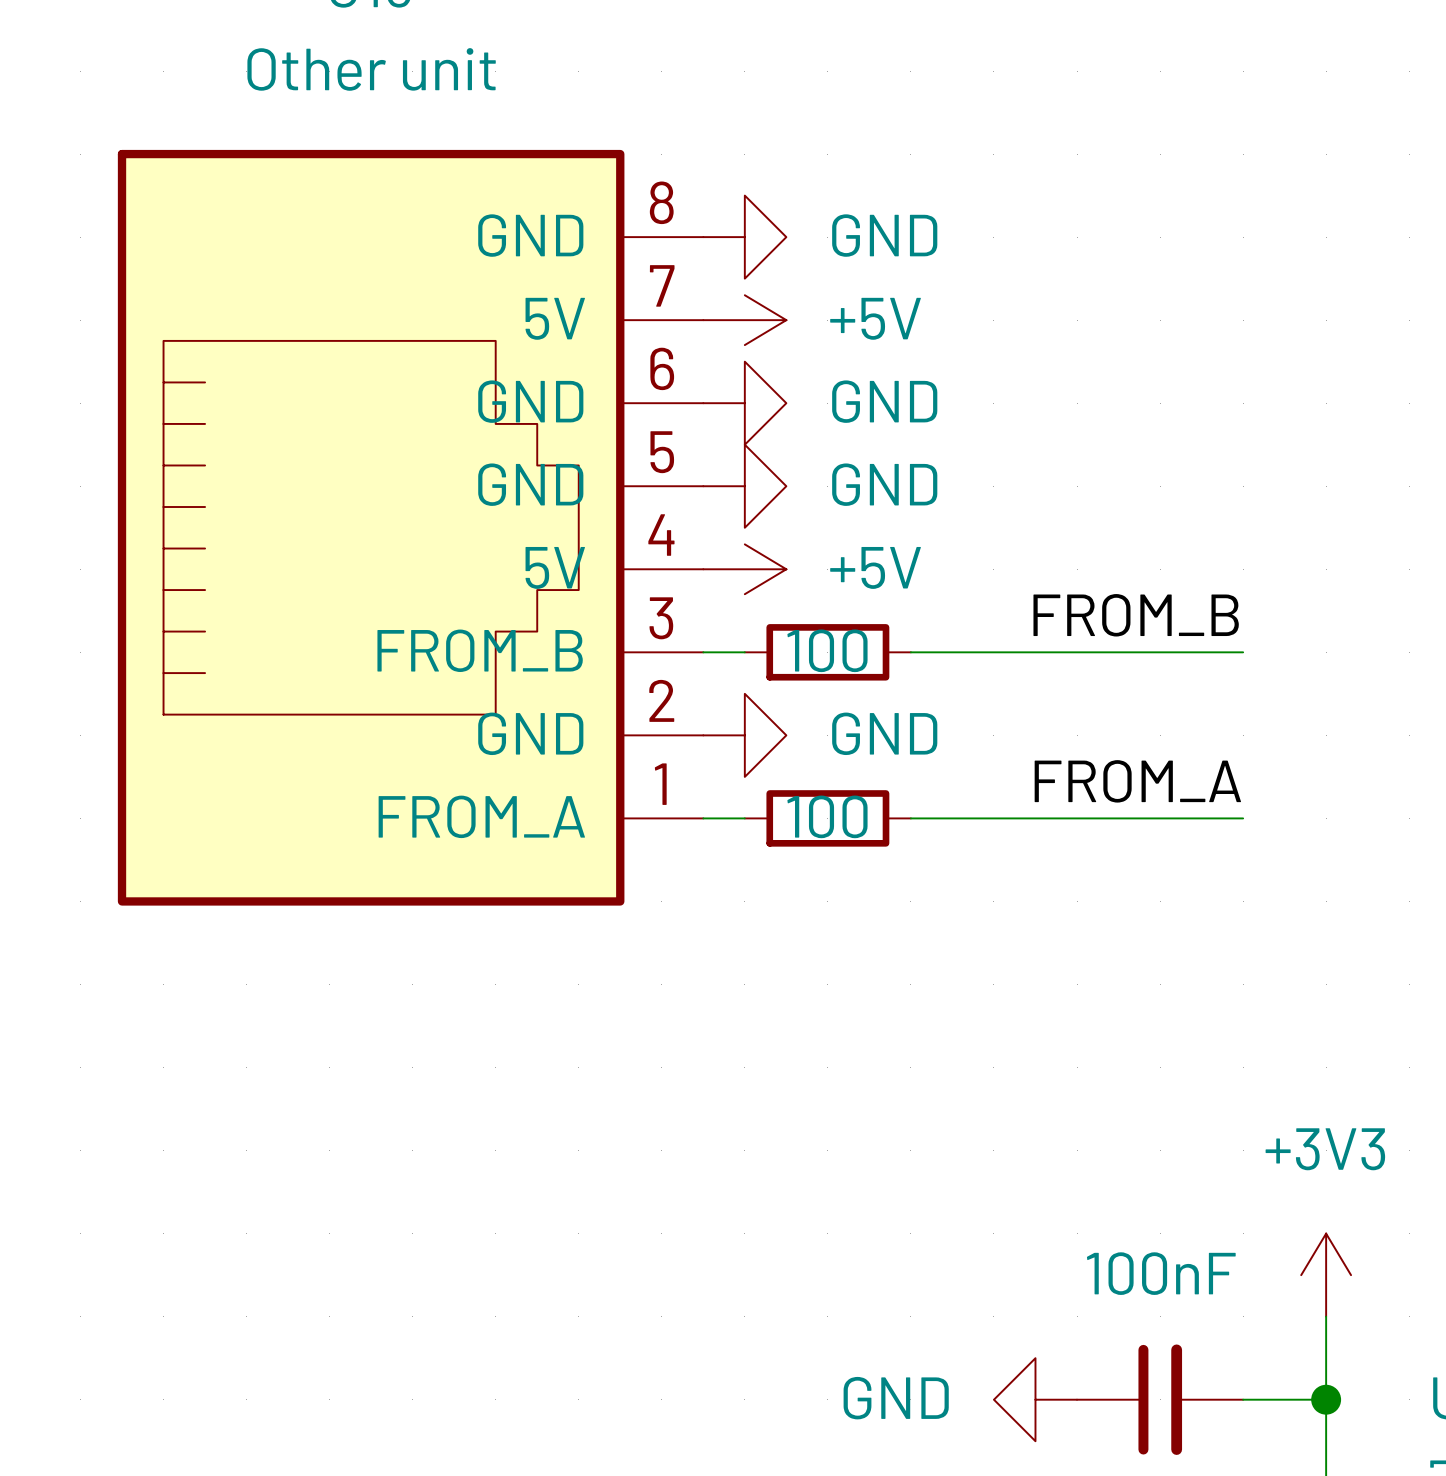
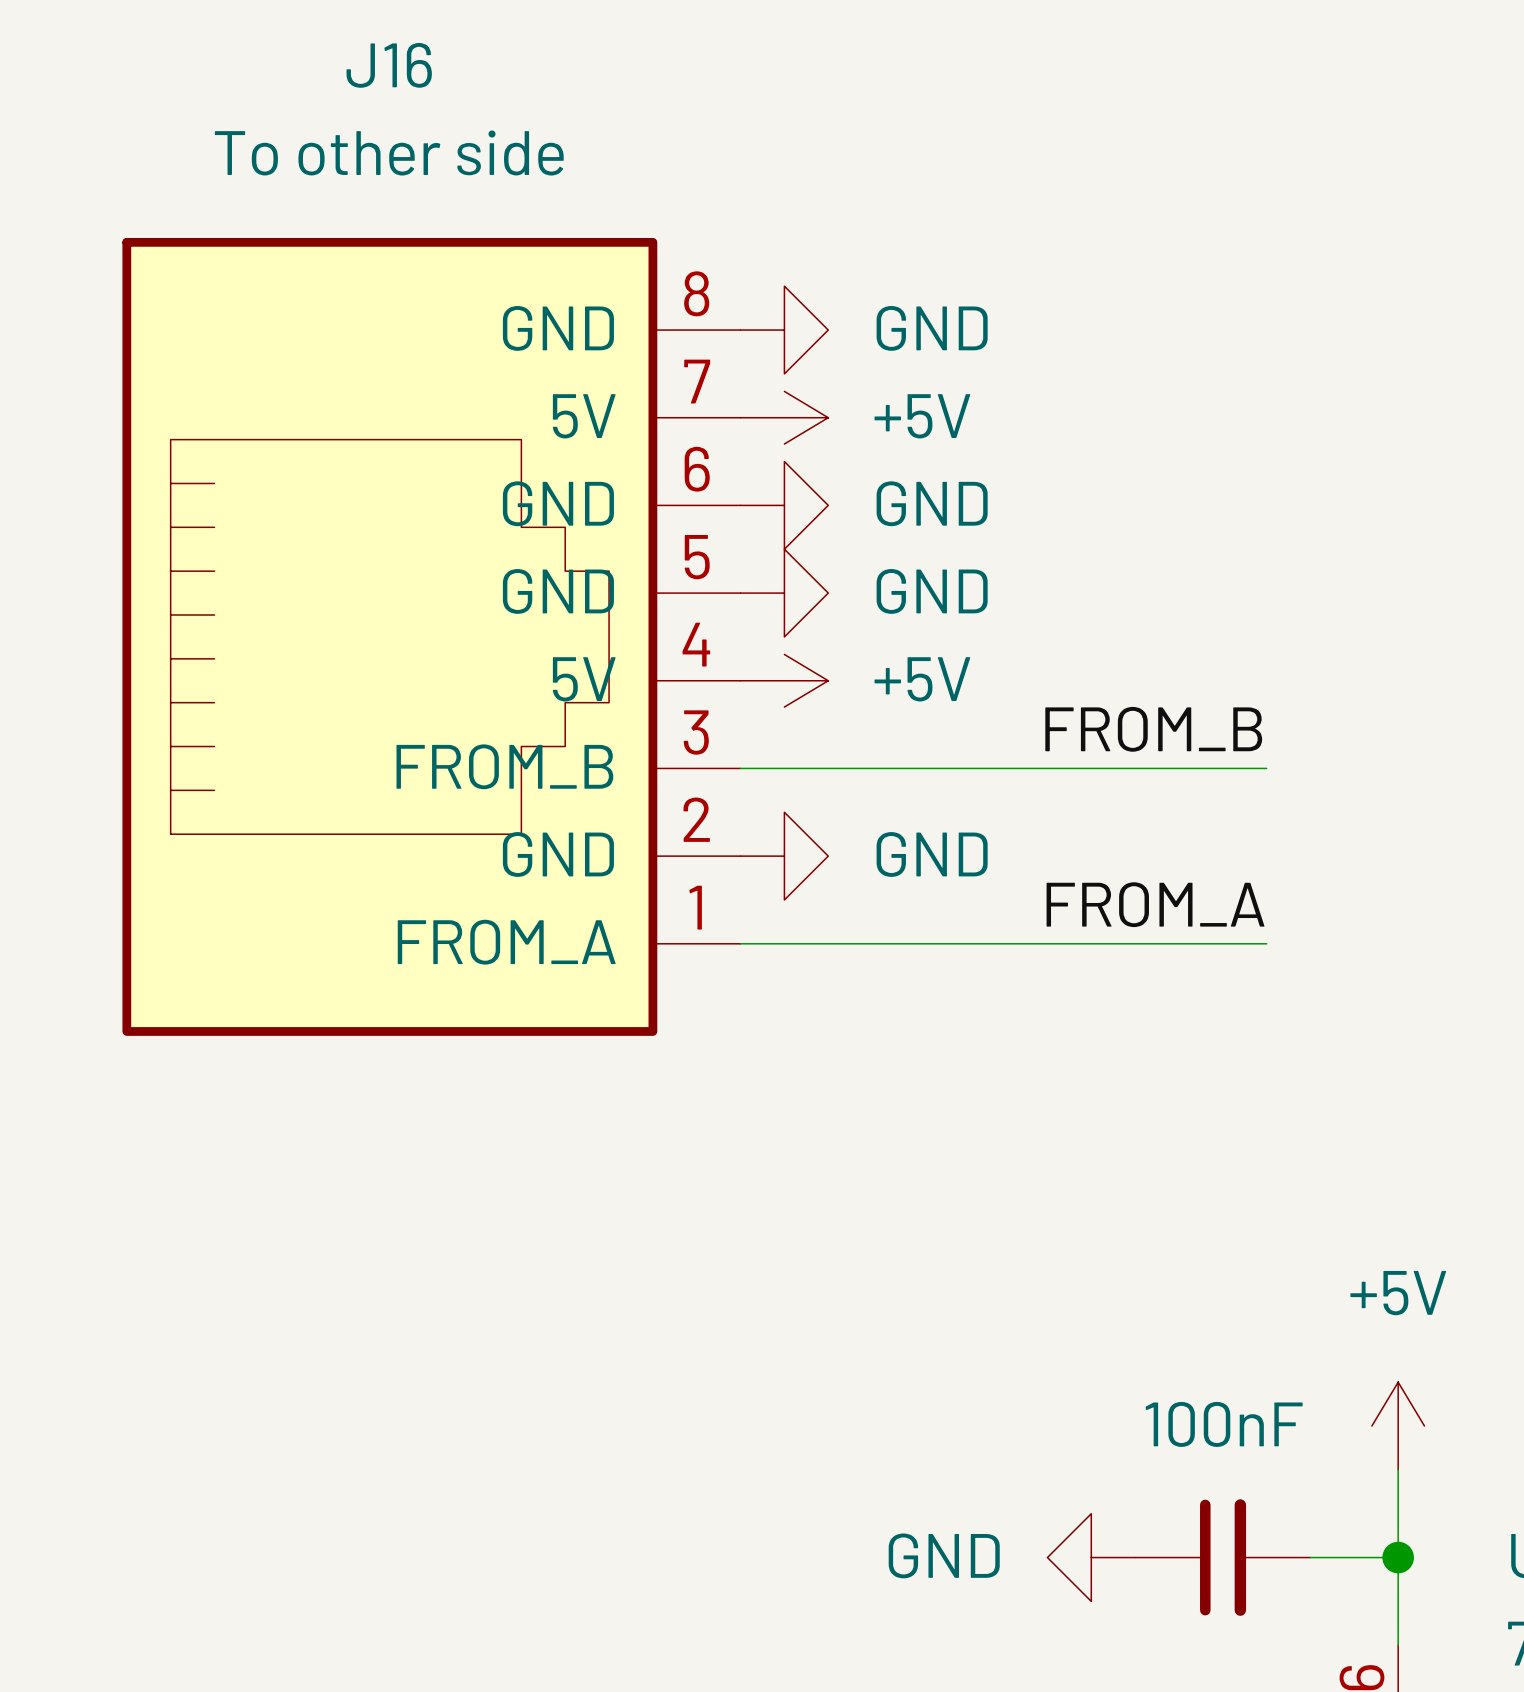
J16 value: Other unit (371, 69) -> To other side (389, 153)
label position: FROM_B (1136, 615) -> FROM_B (1153, 729)
wire: none -> (784, 768) (959, 768)
part: 100 (827, 652) -> none
wire: (1201, 652) (1243, 652) -> none
label position: FROM_A (1137, 781) -> FROM_A (1155, 904)
wire: none -> (784, 943) (959, 943)
part: 100 (827, 818) -> none
wire: (1201, 818) (1243, 818) -> none
power symbol: +3V3 (1326, 1275) -> +5V (1398, 1426)

